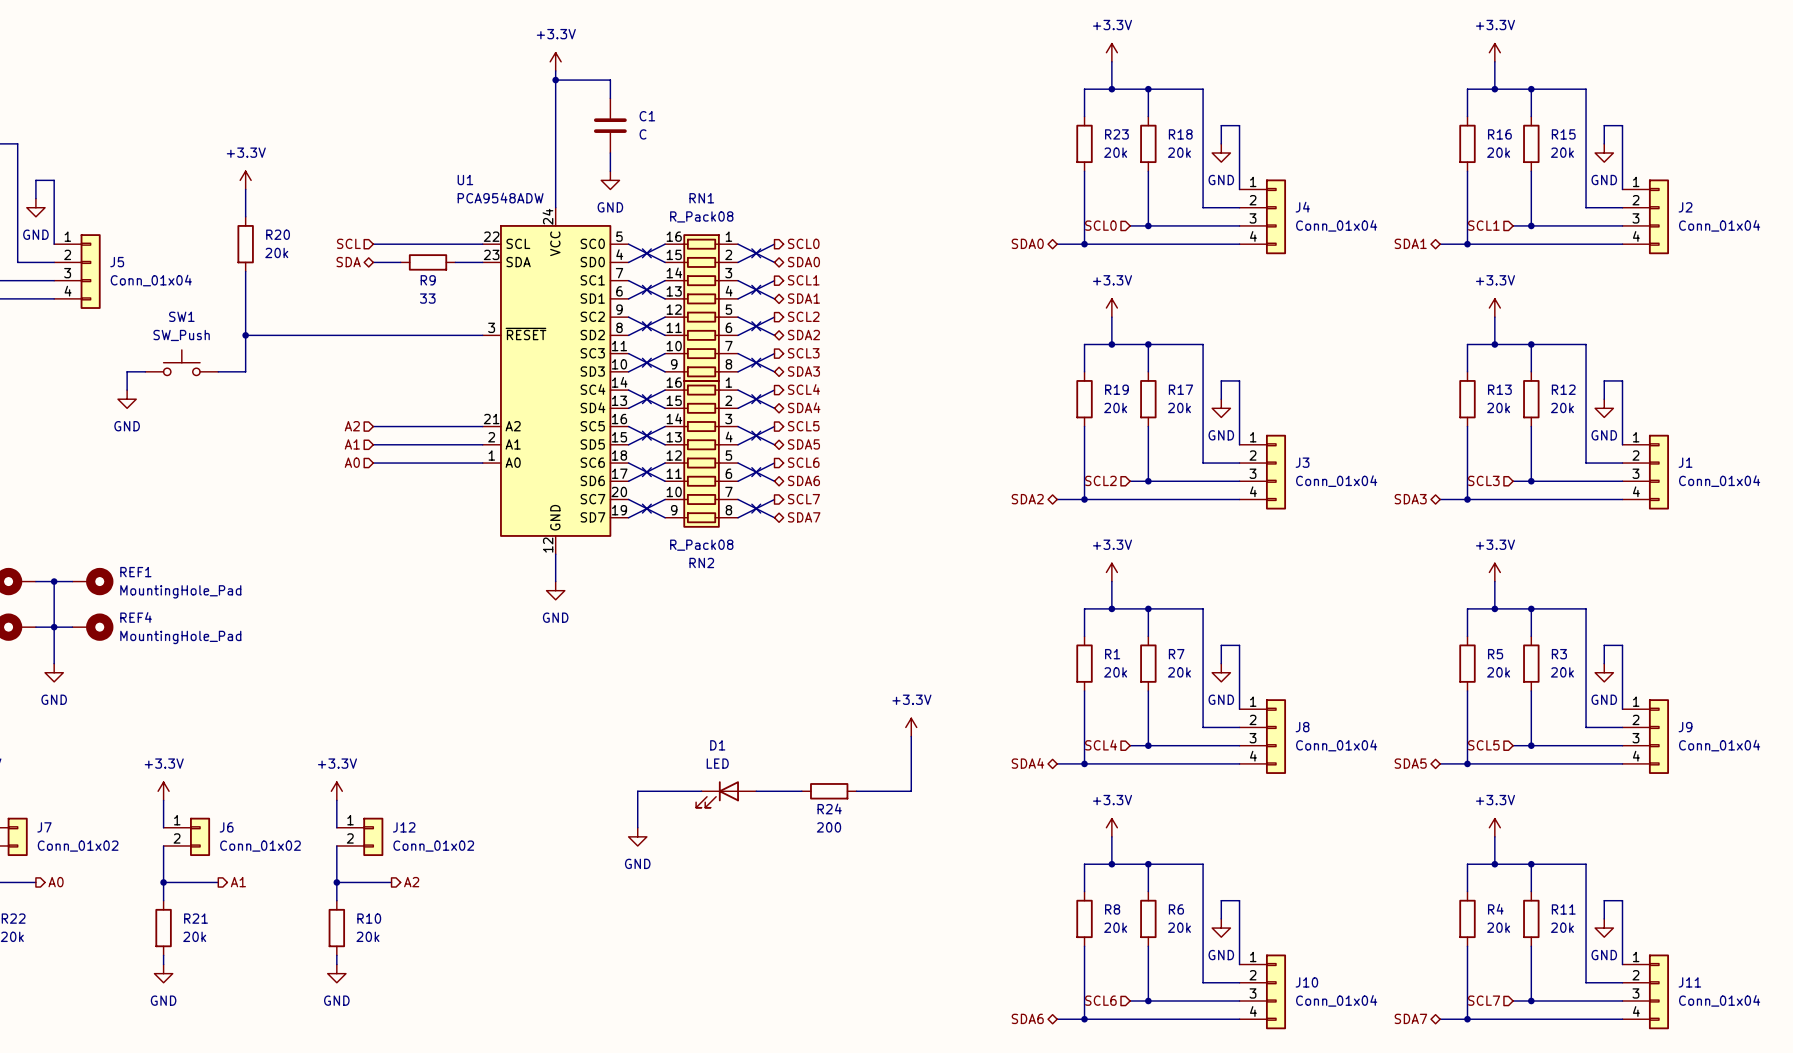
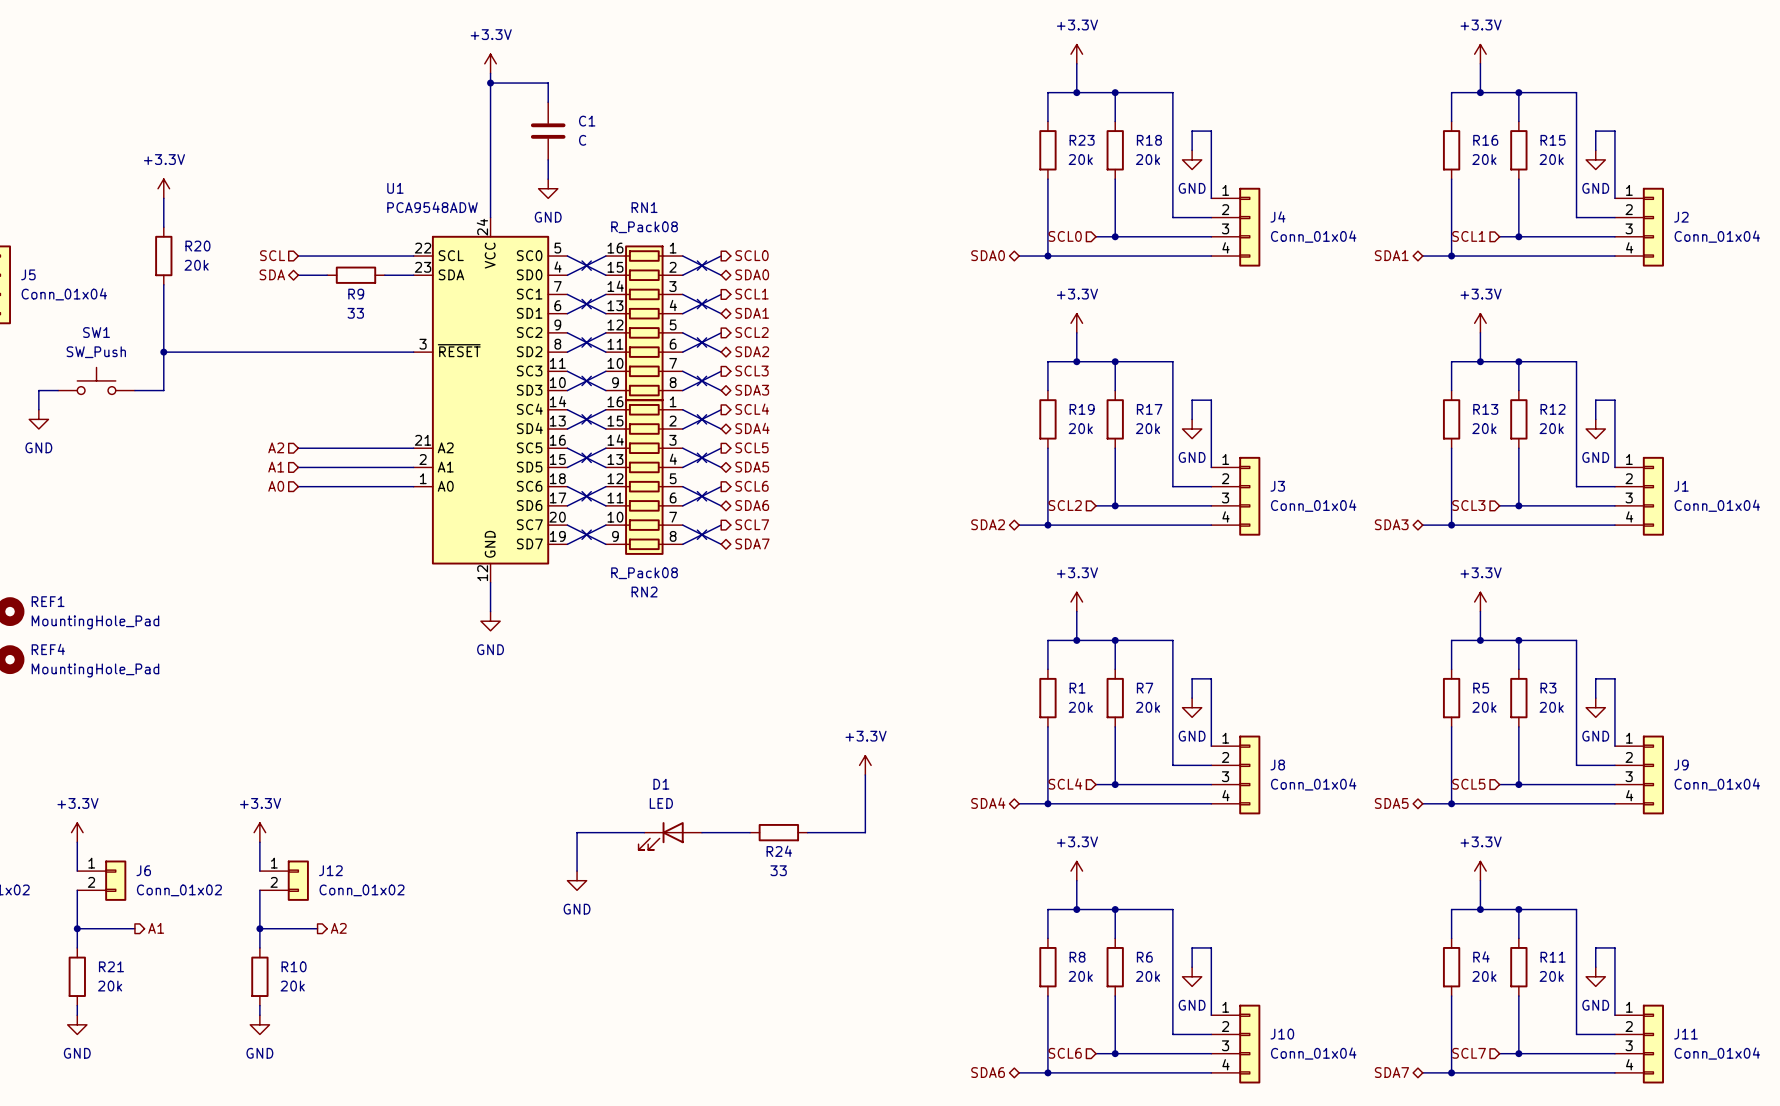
R24 value: 200 (829, 827) -> 33 (778, 870)

